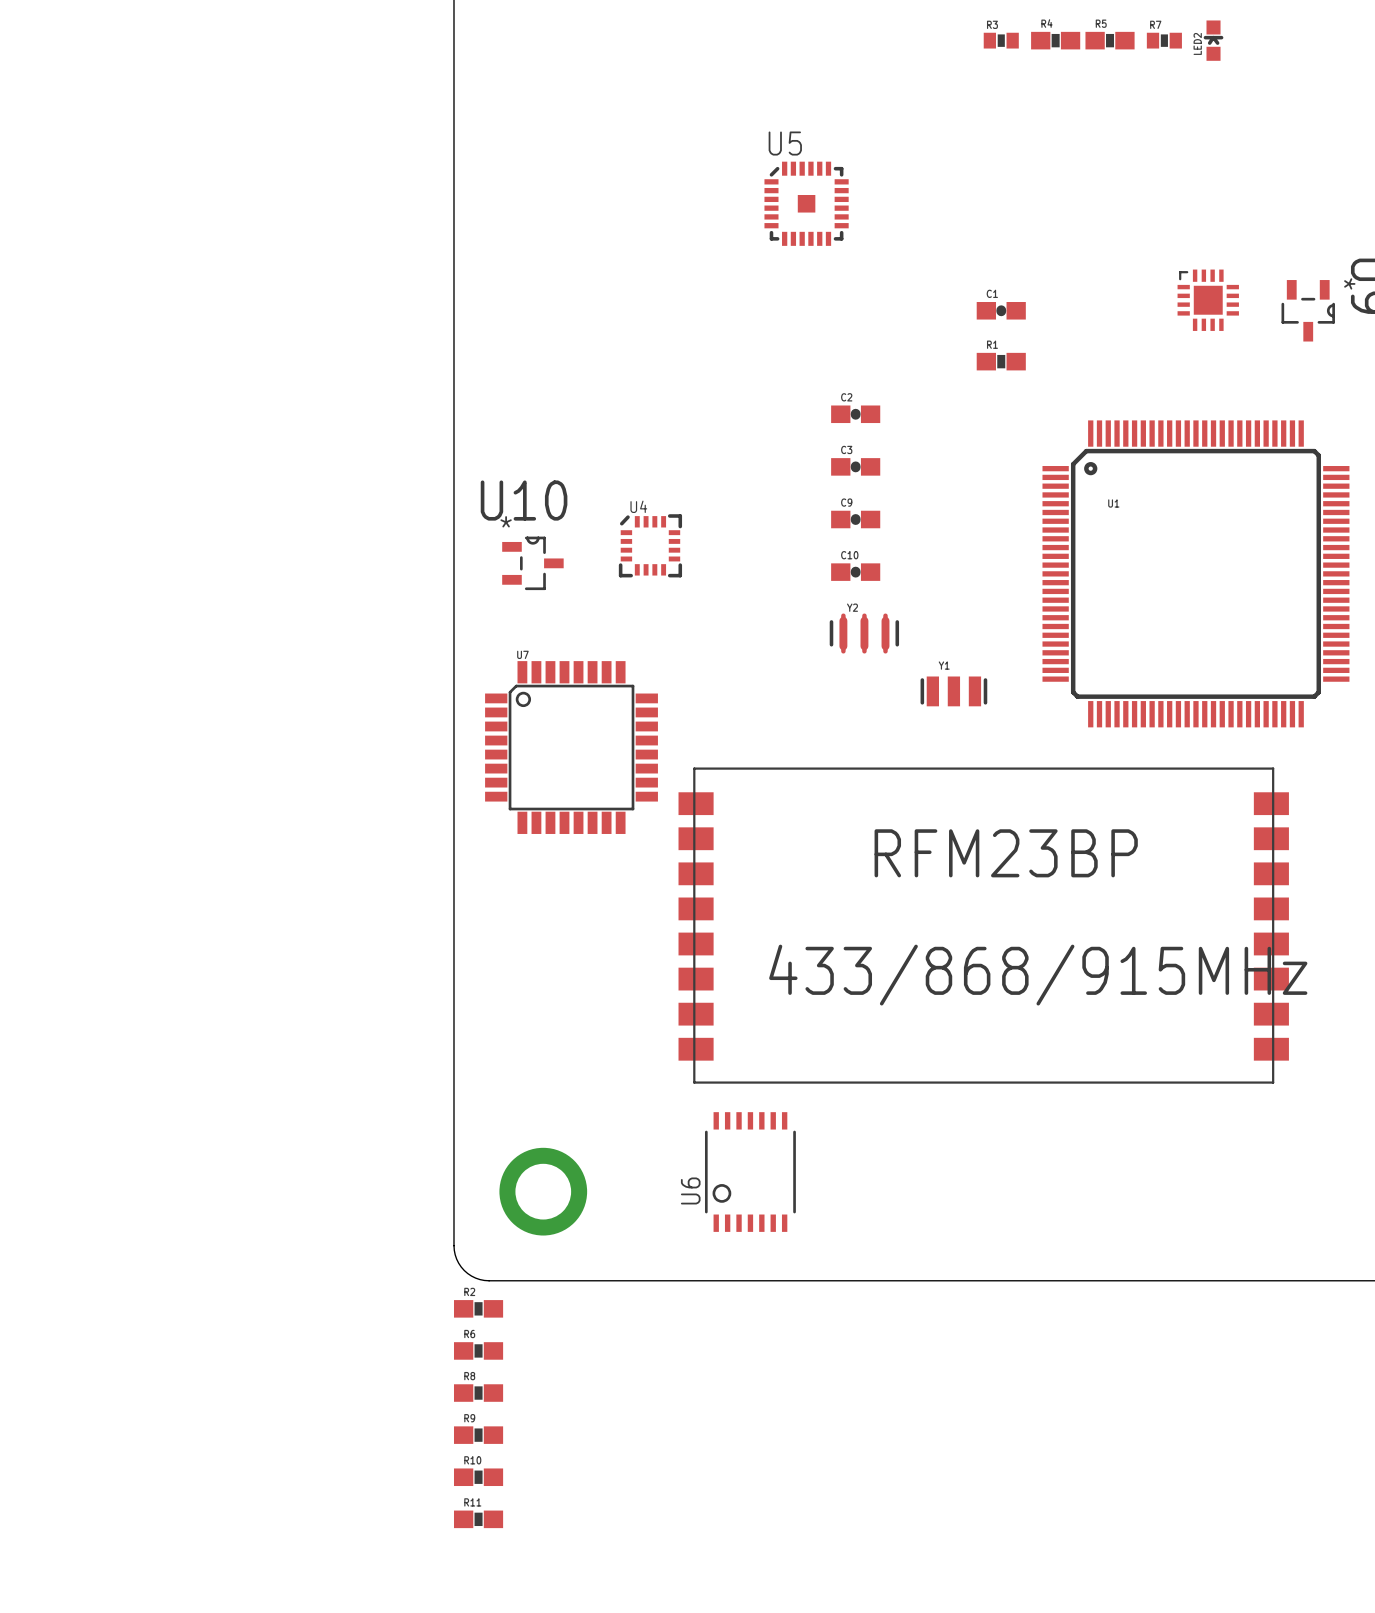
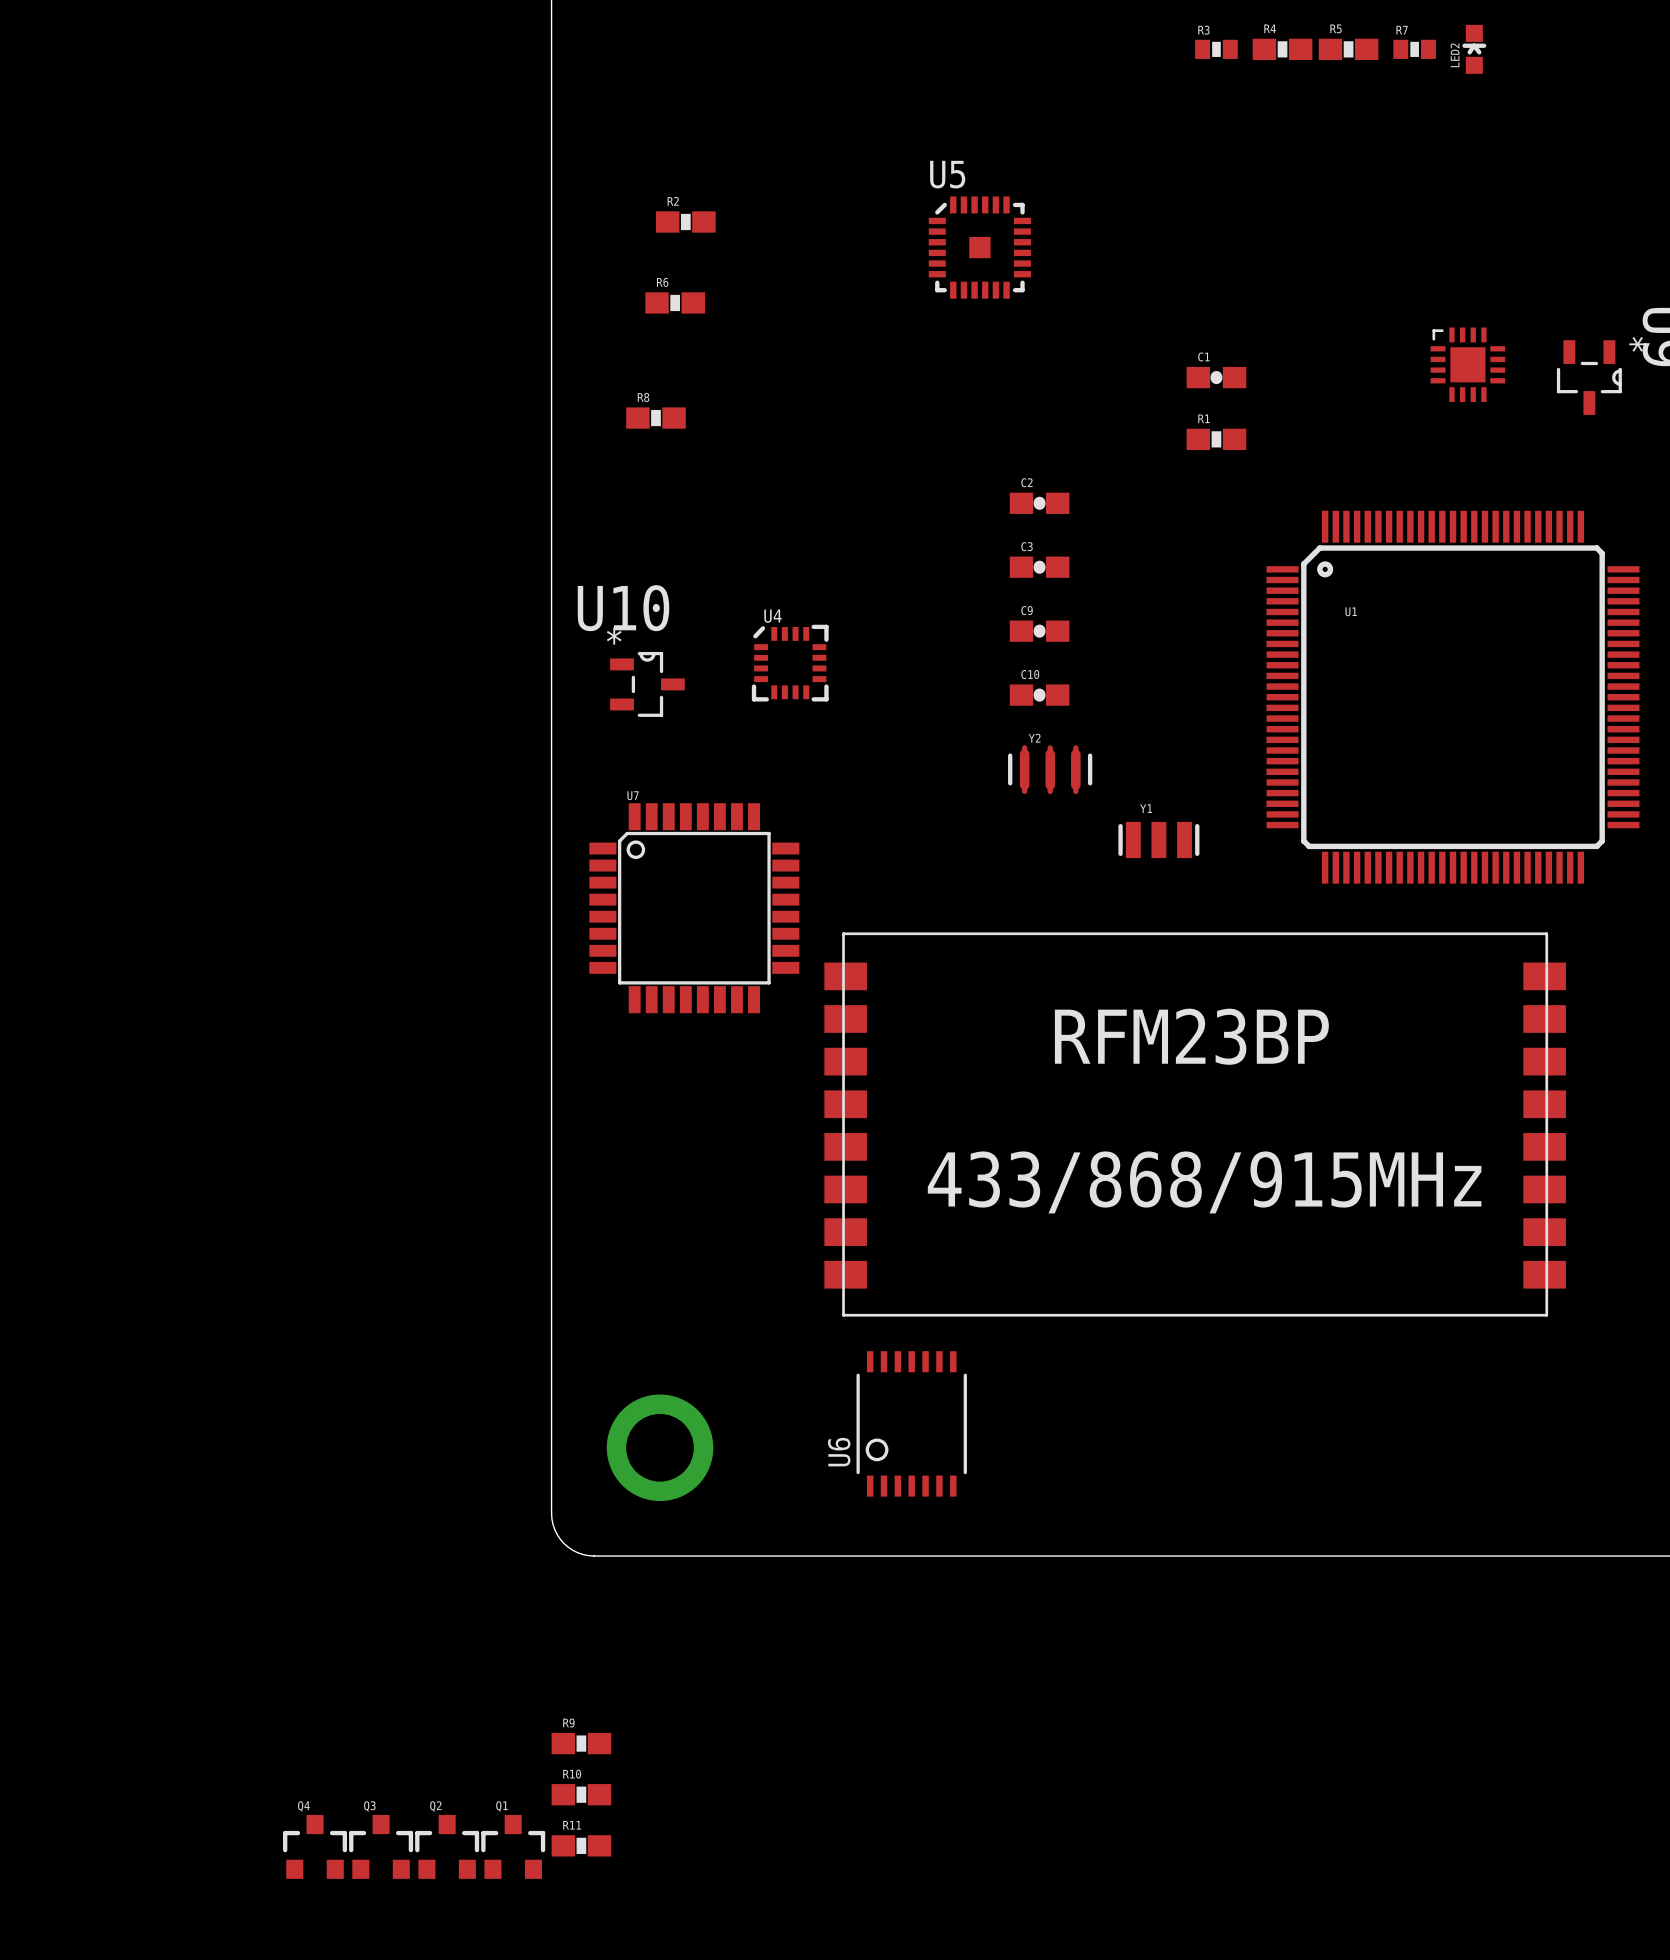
R2 position: (478, 1308) -> (685, 221)
R6 position: (478, 1350) -> (675, 302)
R8 position: (478, 1393) -> (655, 418)
Q4: none -> (315, 1846)
Q3: none -> (381, 1846)
Q2: none -> (447, 1846)
Q1: none -> (513, 1846)

